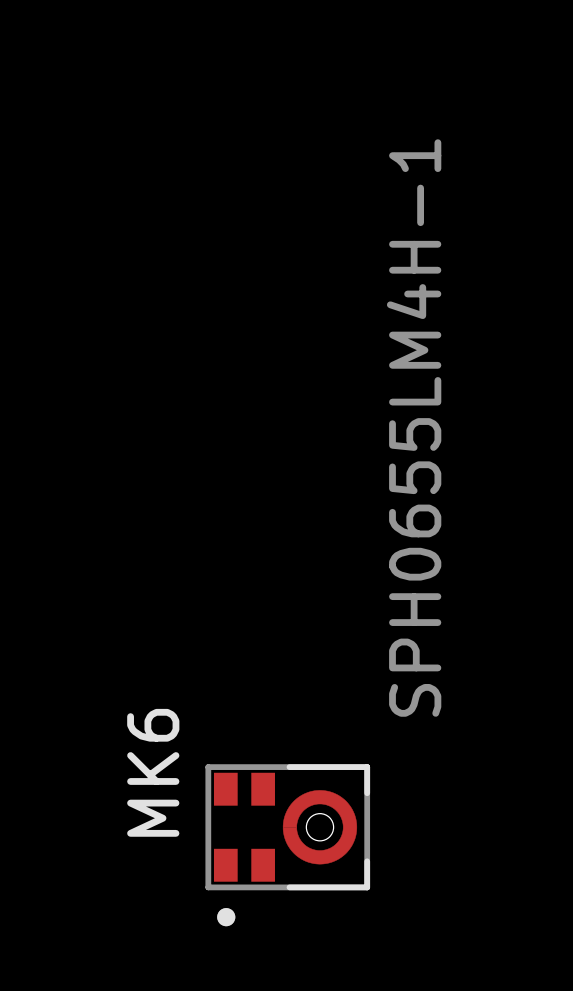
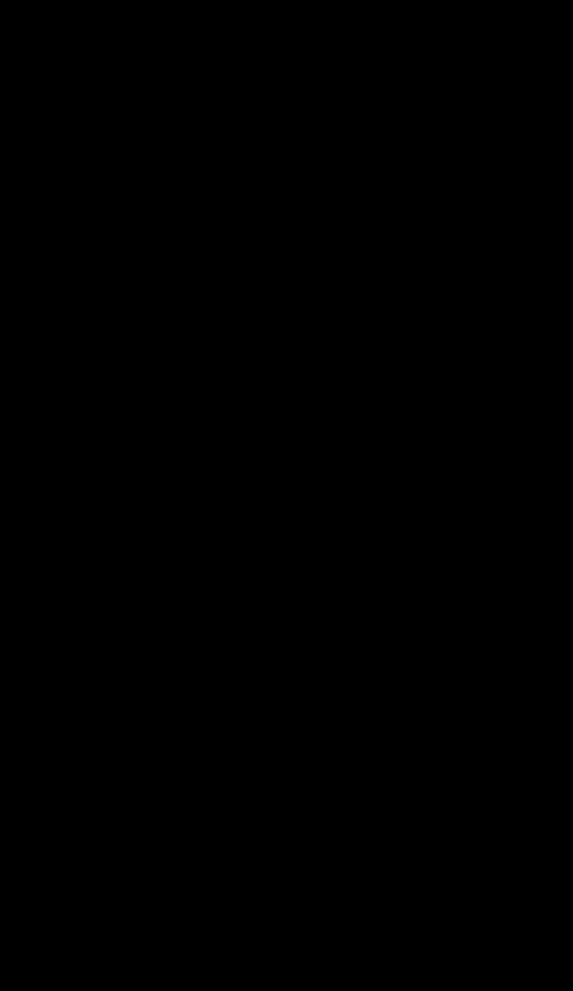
MK6: SPH0655LM4H-1 (287, 845) -> none

